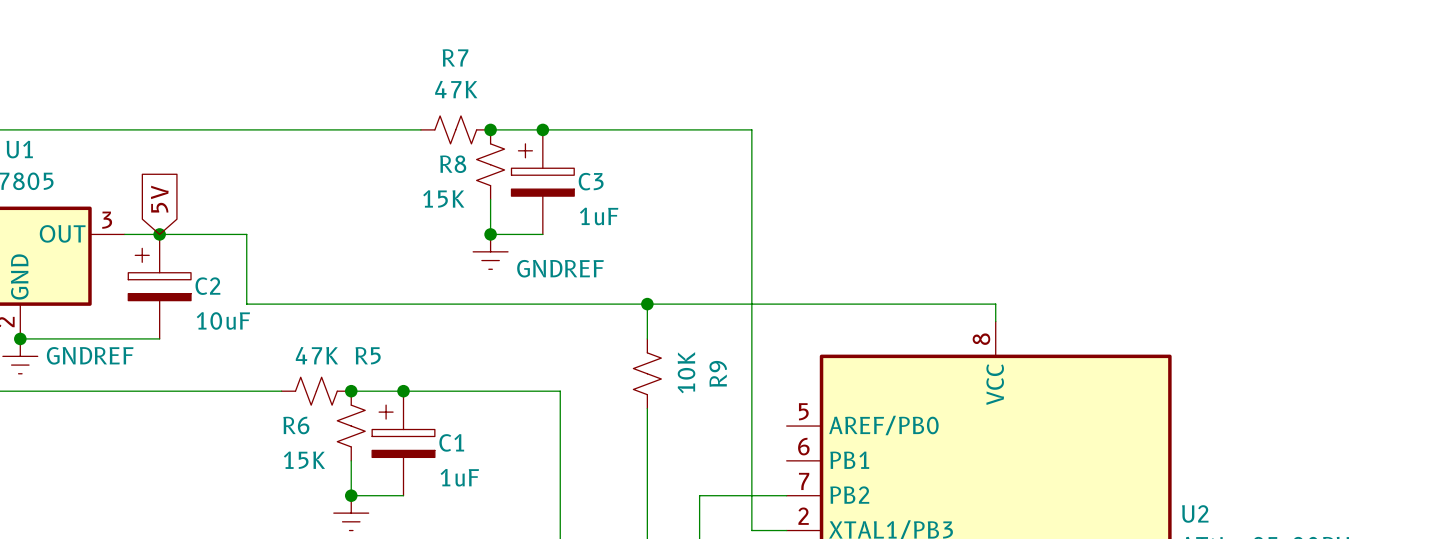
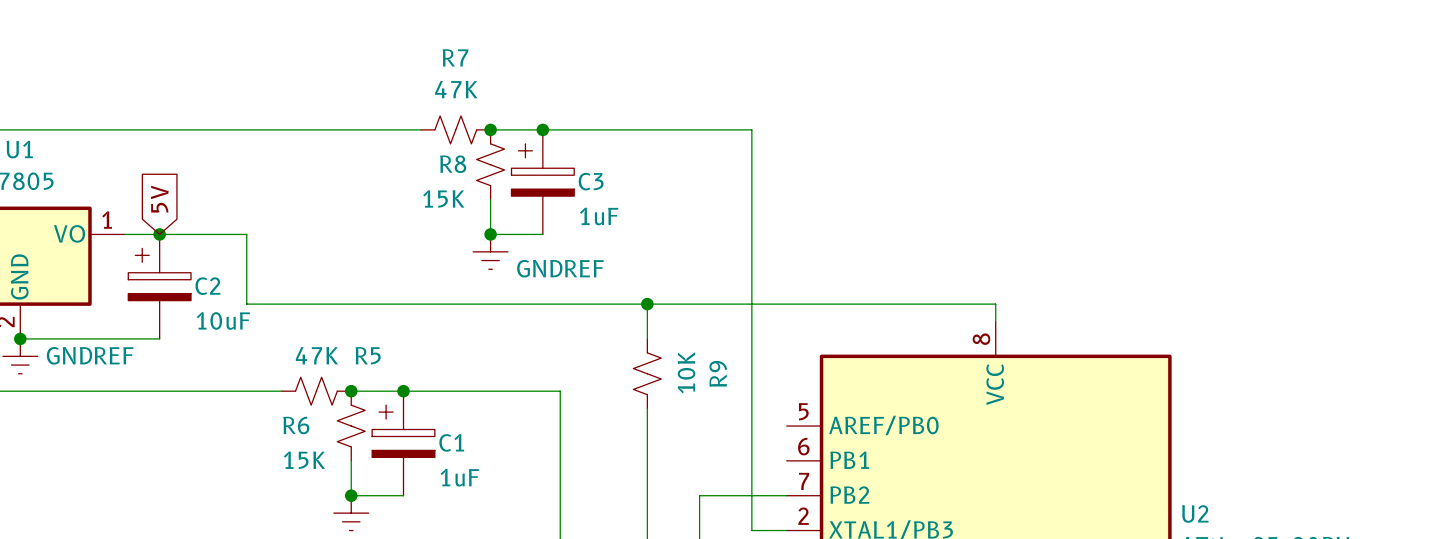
U1 pin number: 3 (107, 220) -> 1 (107, 220)
U1 pin name: OUT (62, 233) -> VO (69, 233)

